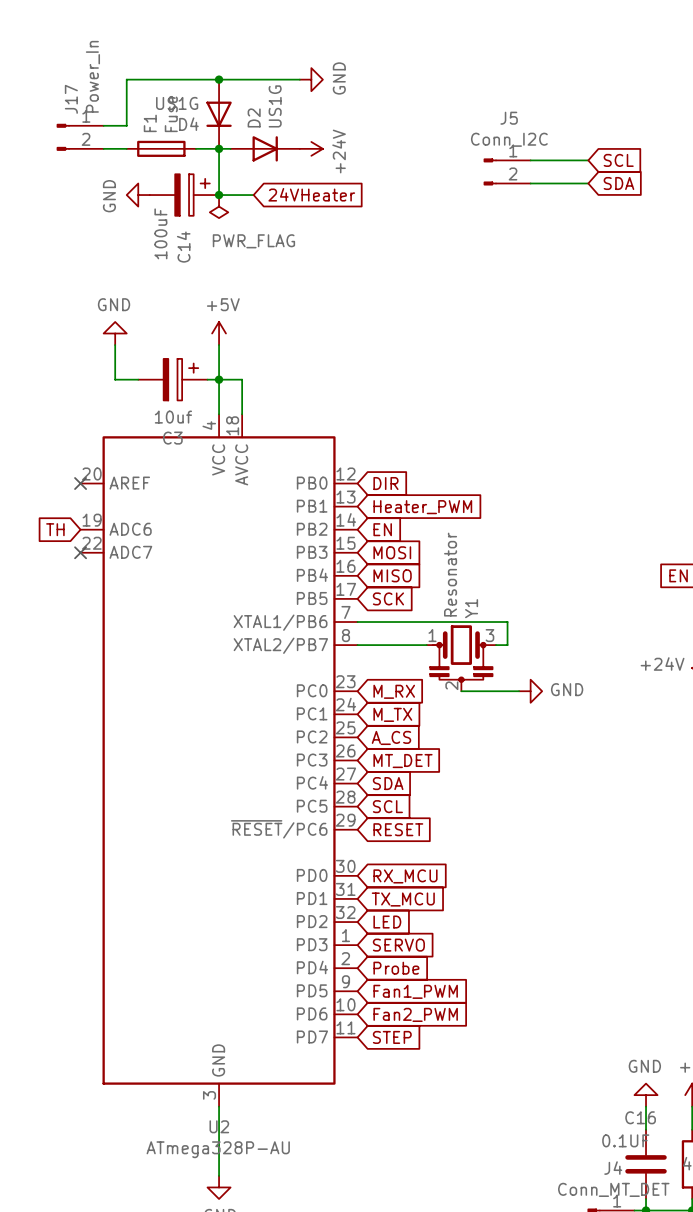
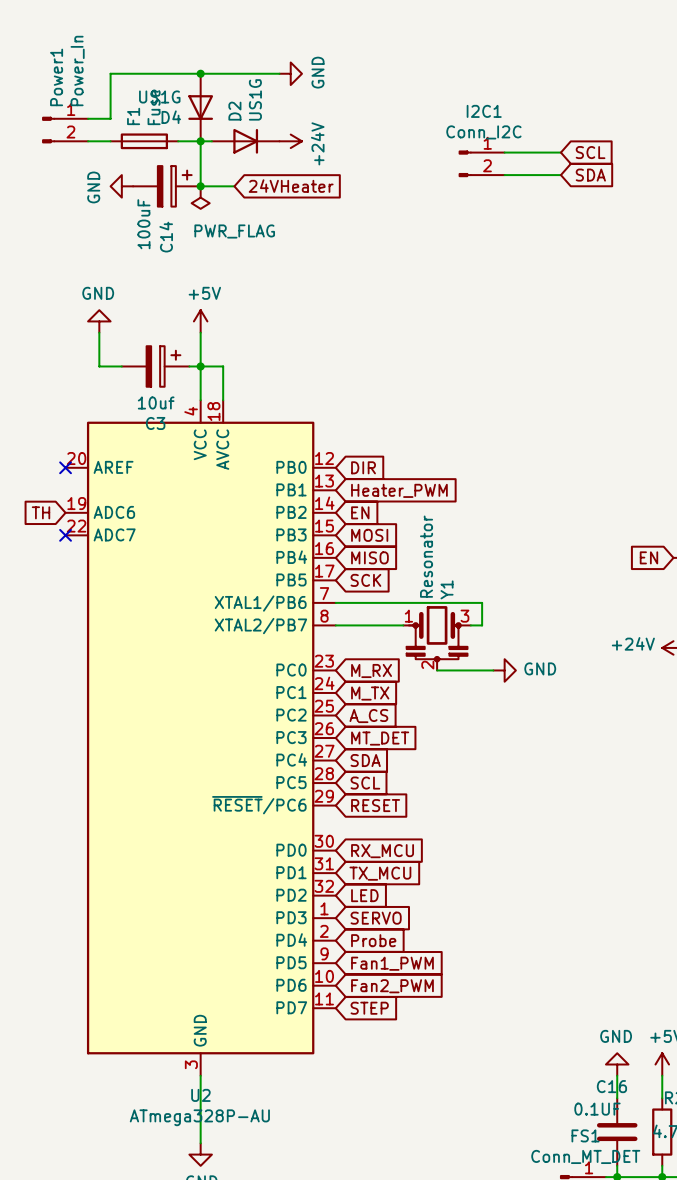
J17 name: J17 (71, 99) -> Power1 (56, 77)
J5 name: J5 (509, 118) -> I2C1 (484, 111)
J4 name: J4 (613, 1168) -> FS1 (585, 1135)

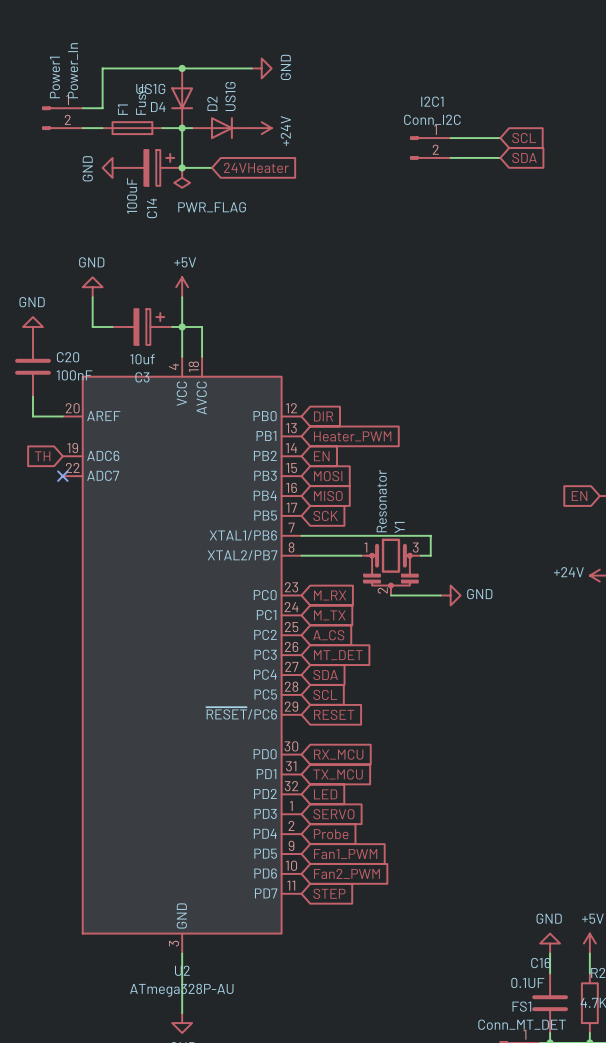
power symbol: none -> GND (33, 327)
C20: none -> 100nF (33, 366)
wire: none -> (33, 396) (33, 416) (62, 416)
no-connect mark: (65, 467) -> none

